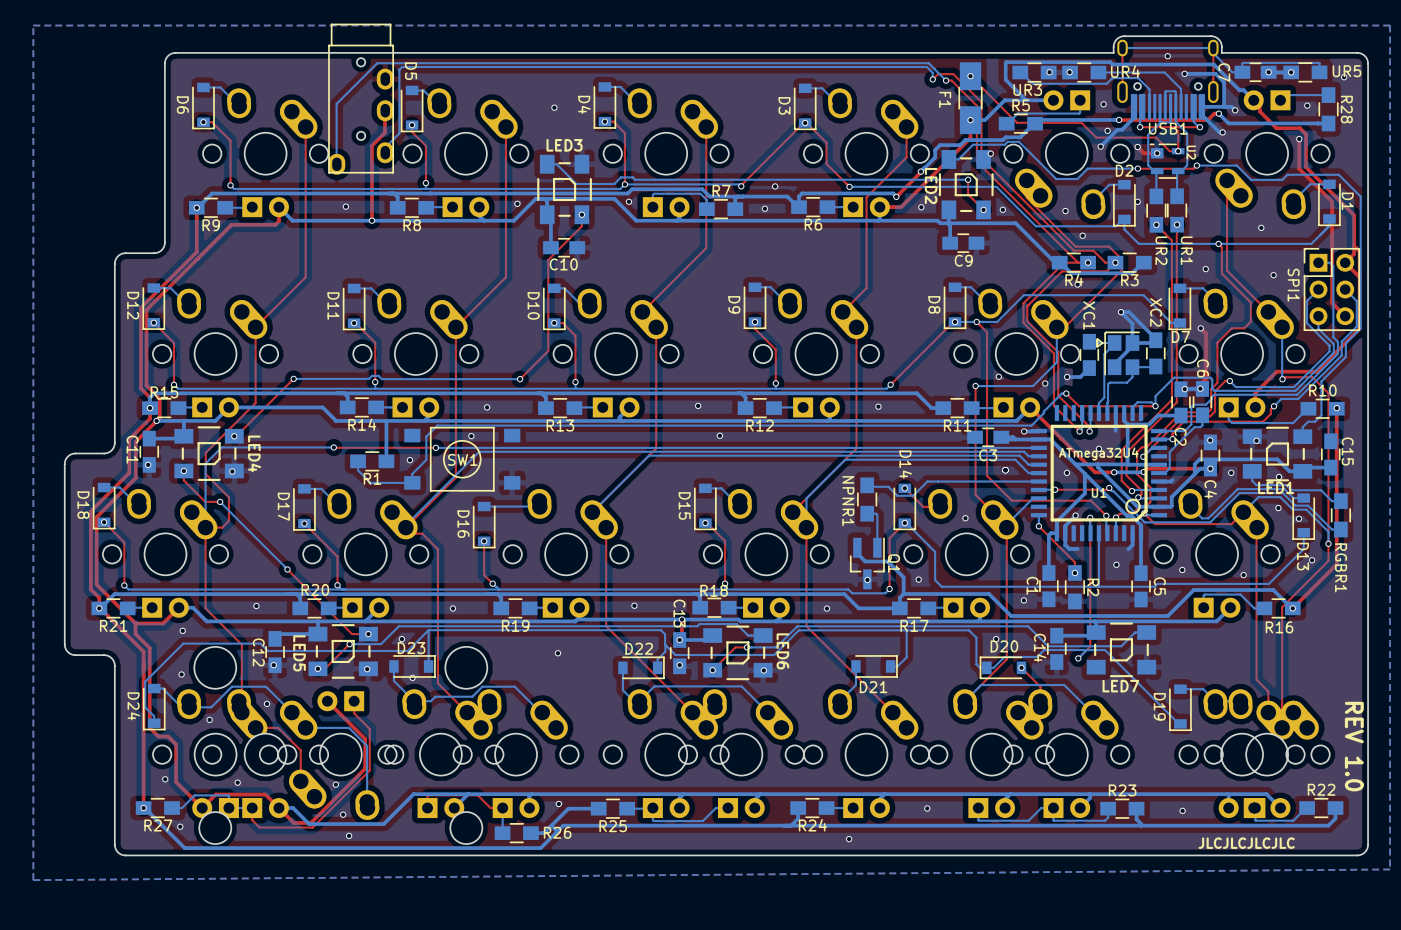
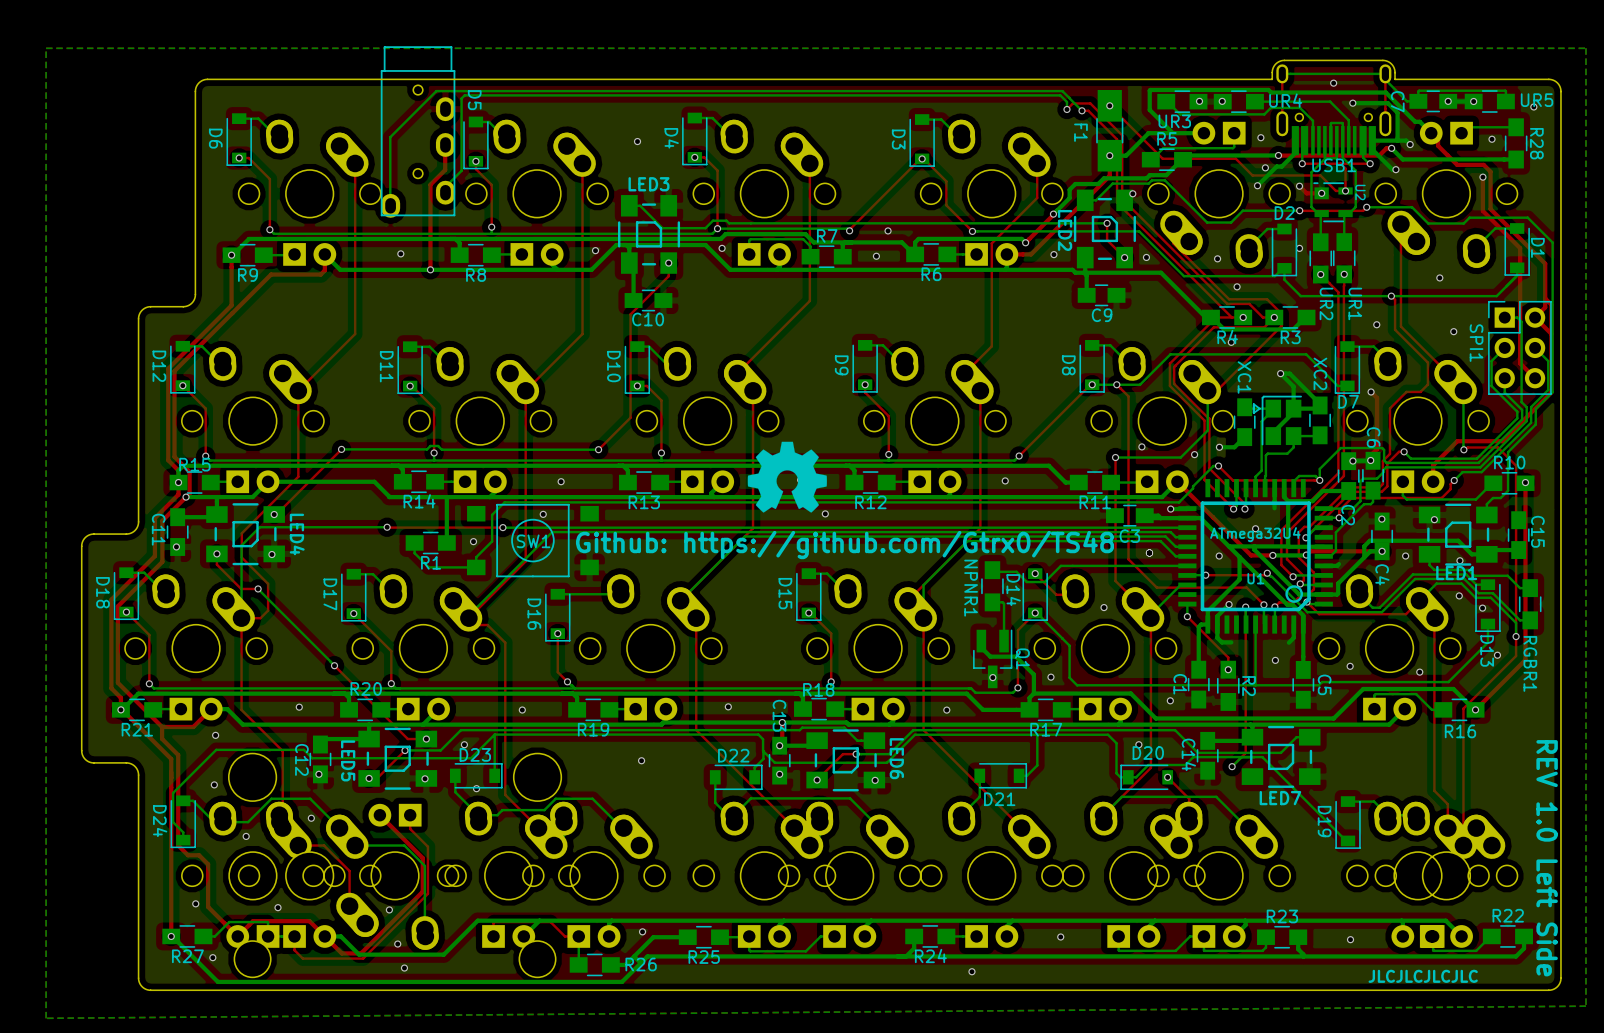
drawing: none -> [747, 441, 827, 513]
text: none -> Github: https://github.com/Gtrx0/TS48 (844, 545)
D14 name position: D14 (905, 464) -> D14 (1013, 590)
text: REV 1.0 (1354, 746) -> REV 1.0 Left Side (1547, 858)

